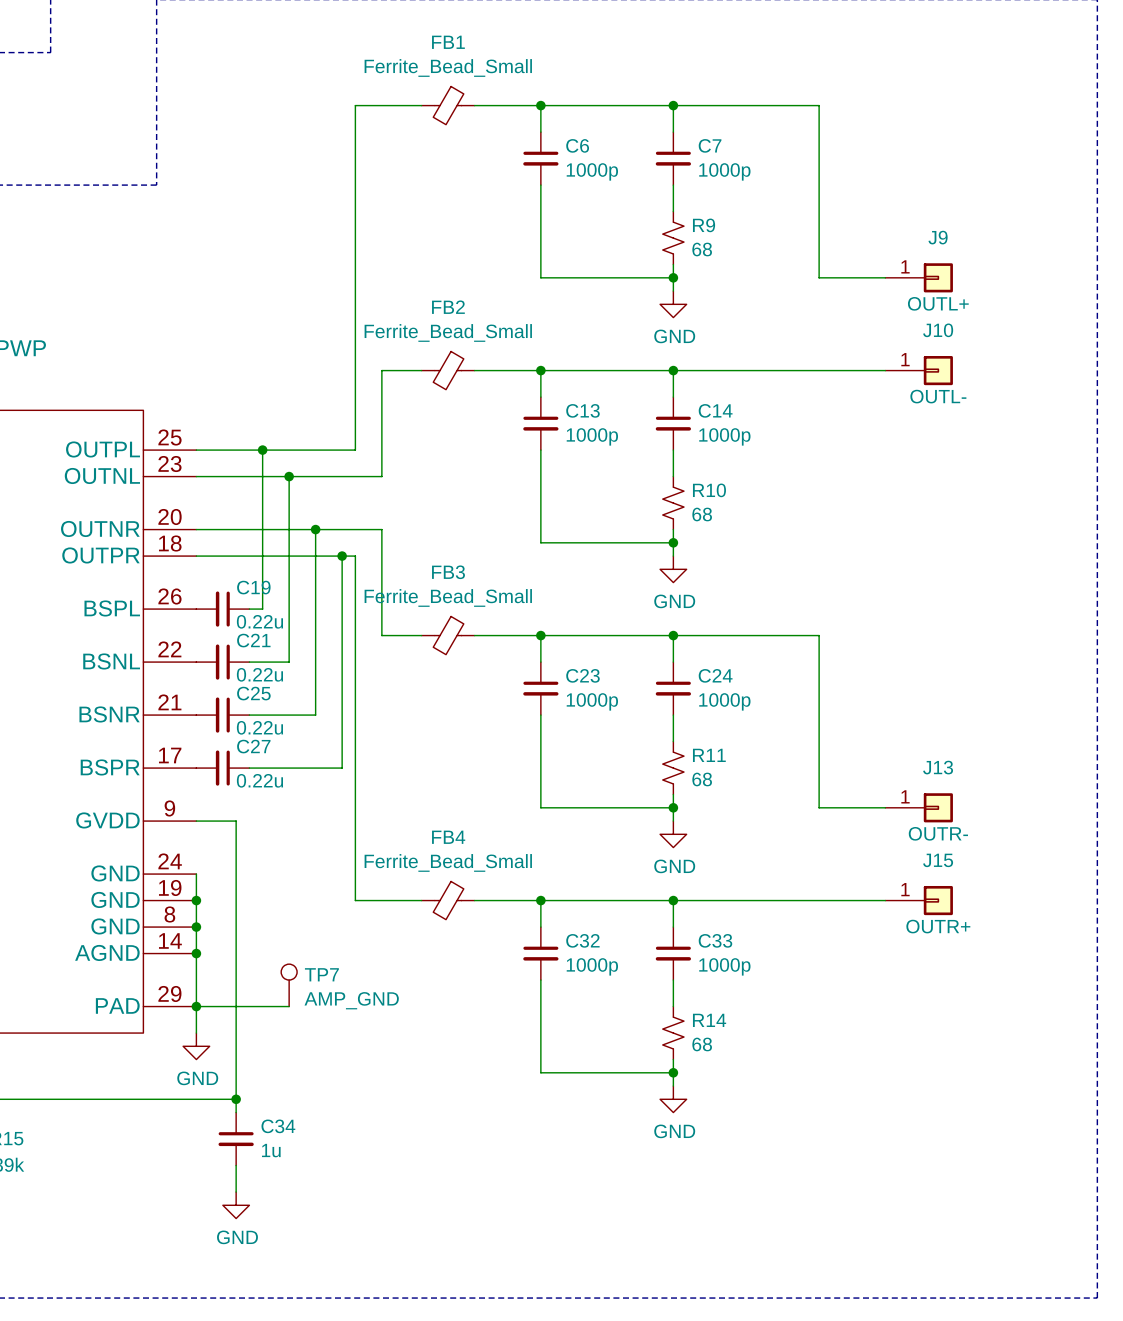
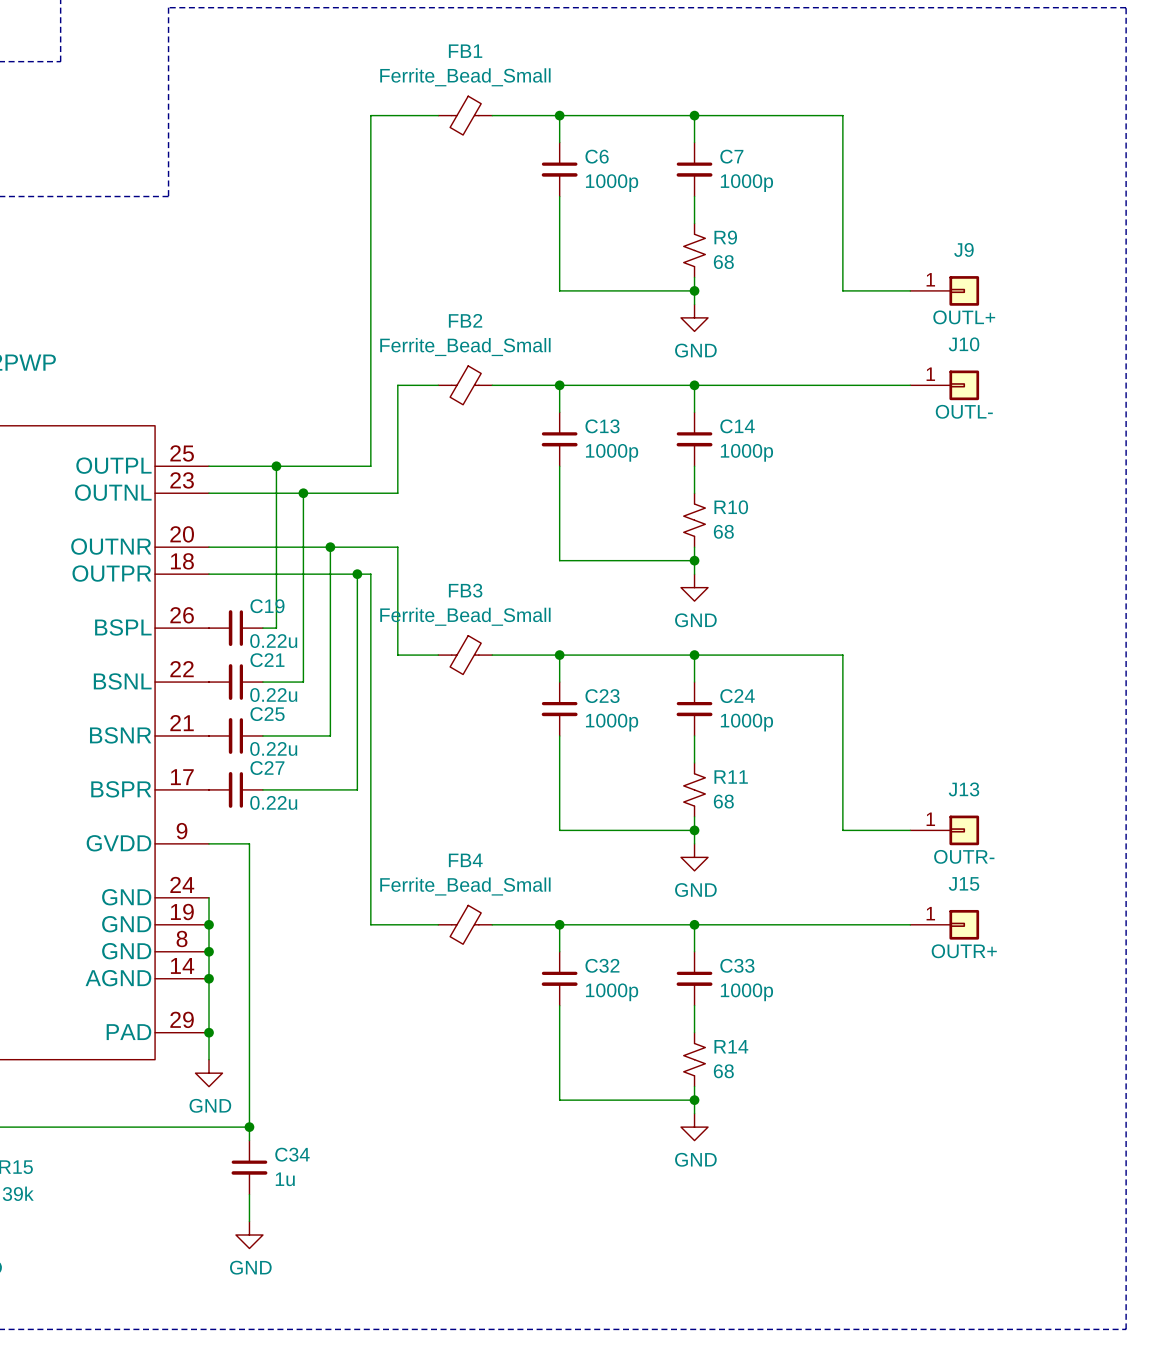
TP7: AMP_GND (289, 985) -> none
wire: (196, 1006) (289, 1006) -> none

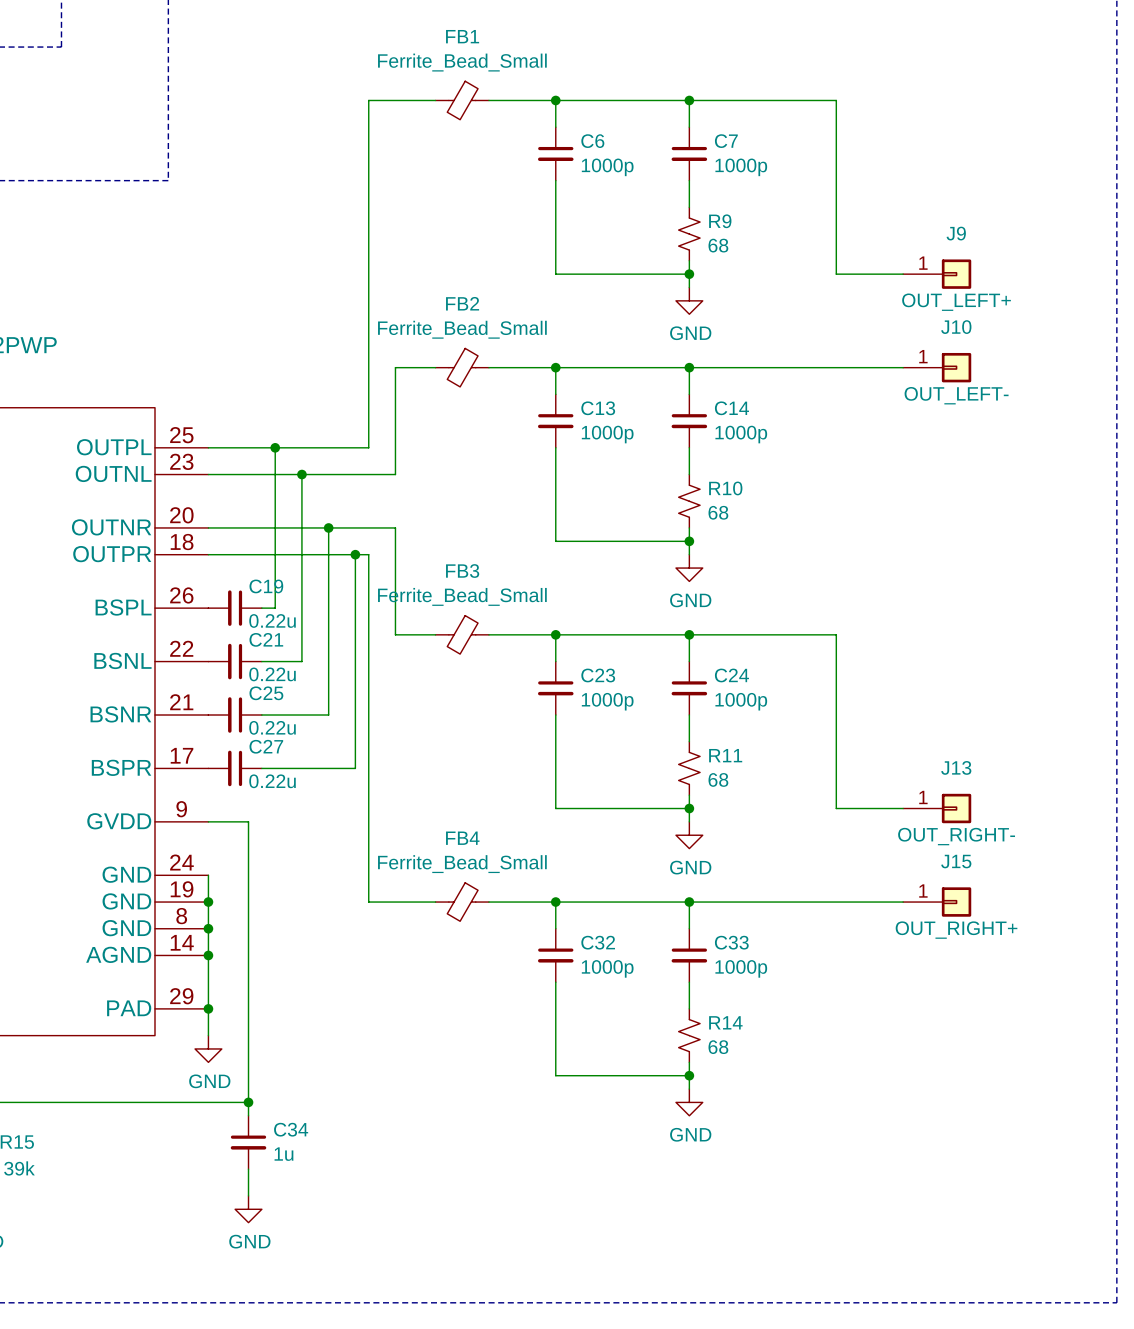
J9 value: OUTL+ (964, 317) -> OUT_LEFT+ (956, 302)
J10 value: OUTL- (964, 411) -> OUT_LEFT- (956, 395)
J13 value: OUTR- (964, 856) -> OUT_RIGHT- (956, 836)
J15 value: OUTR+ (964, 951) -> OUT_RIGHT+ (956, 930)

